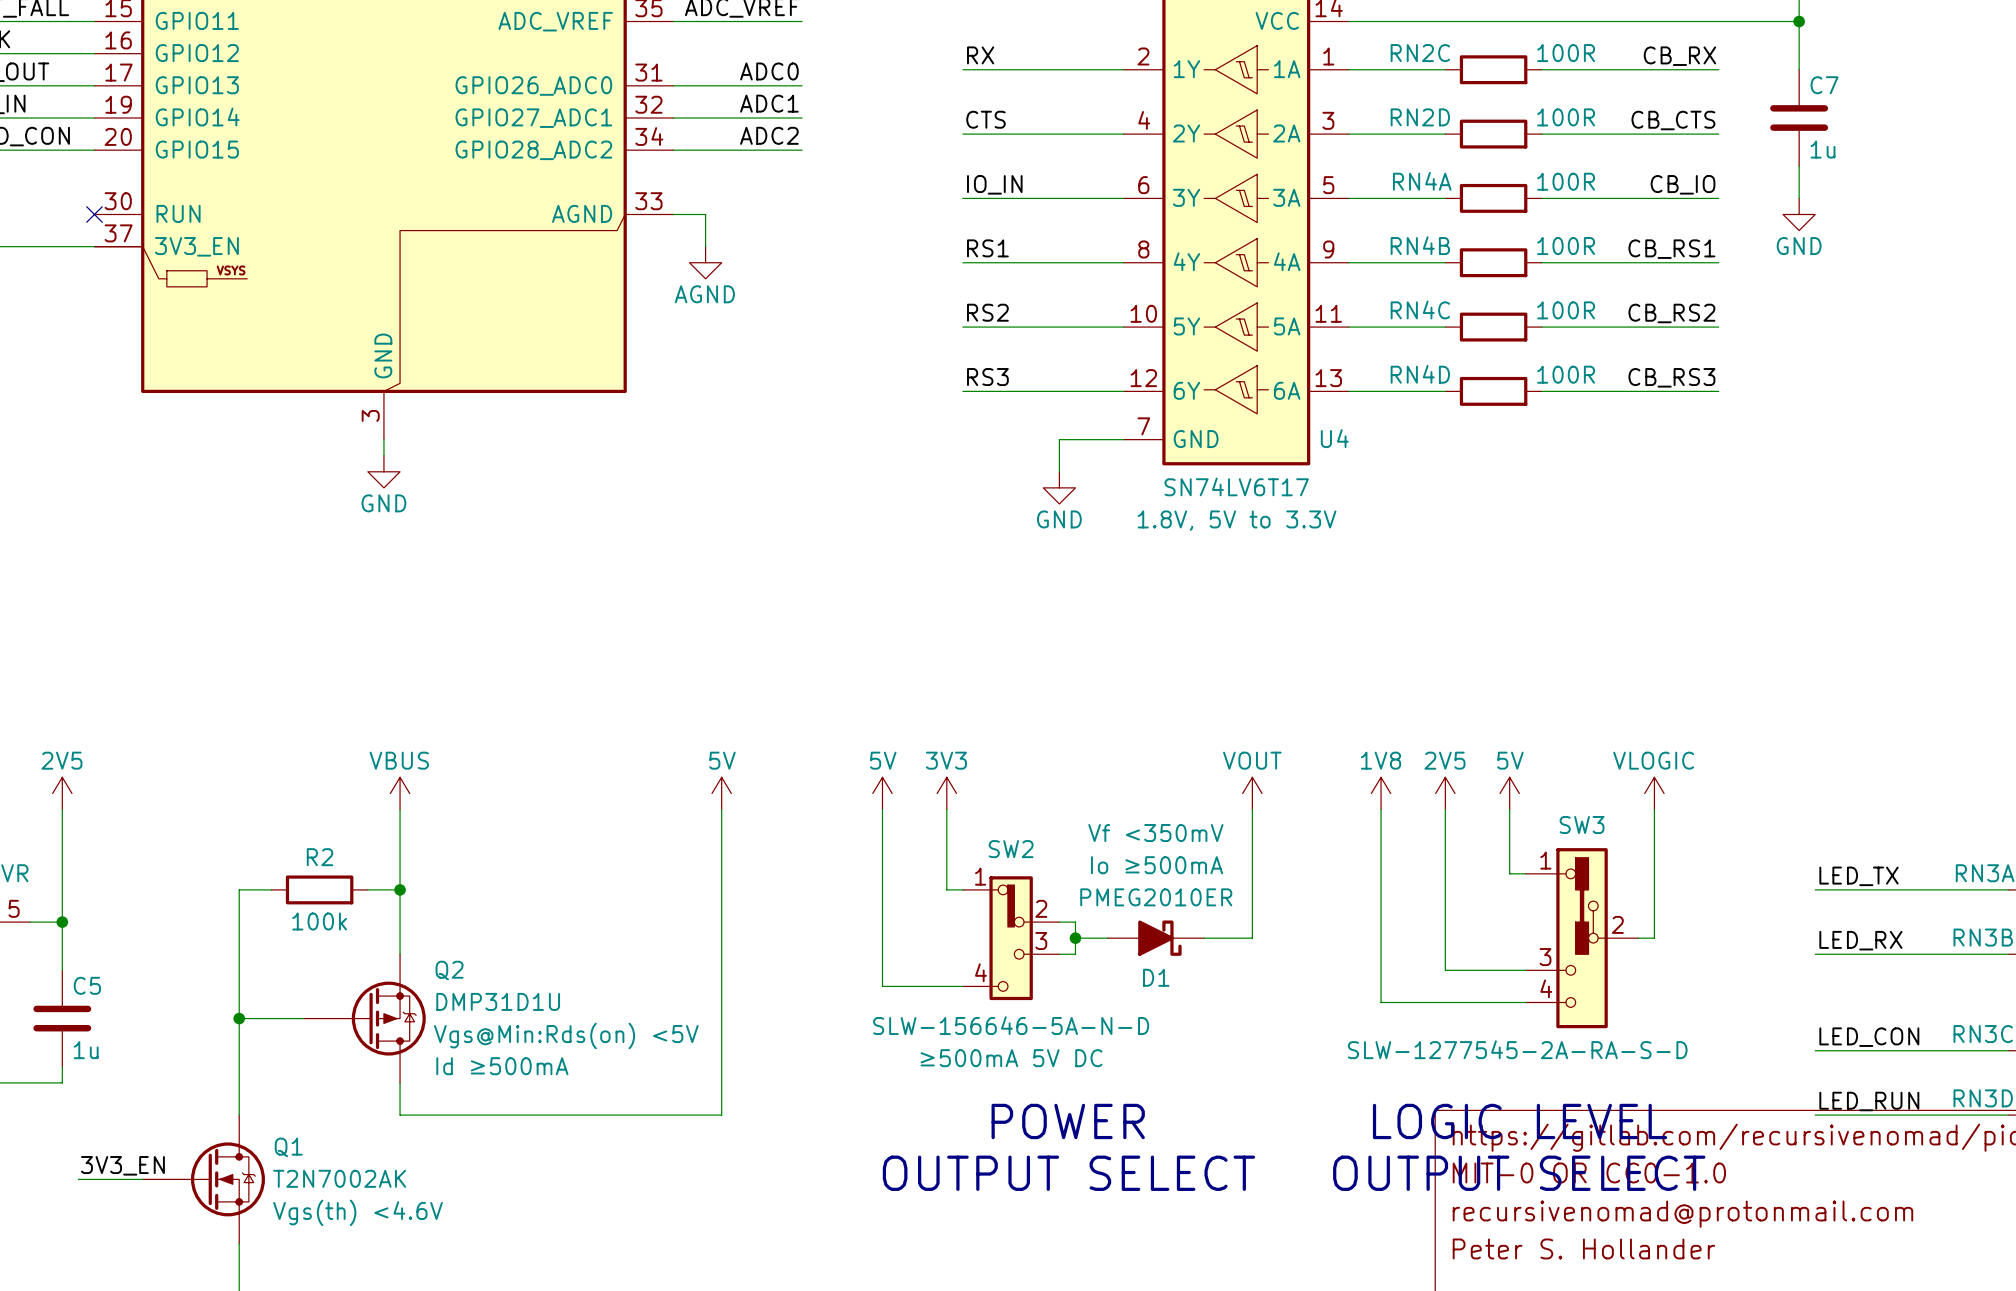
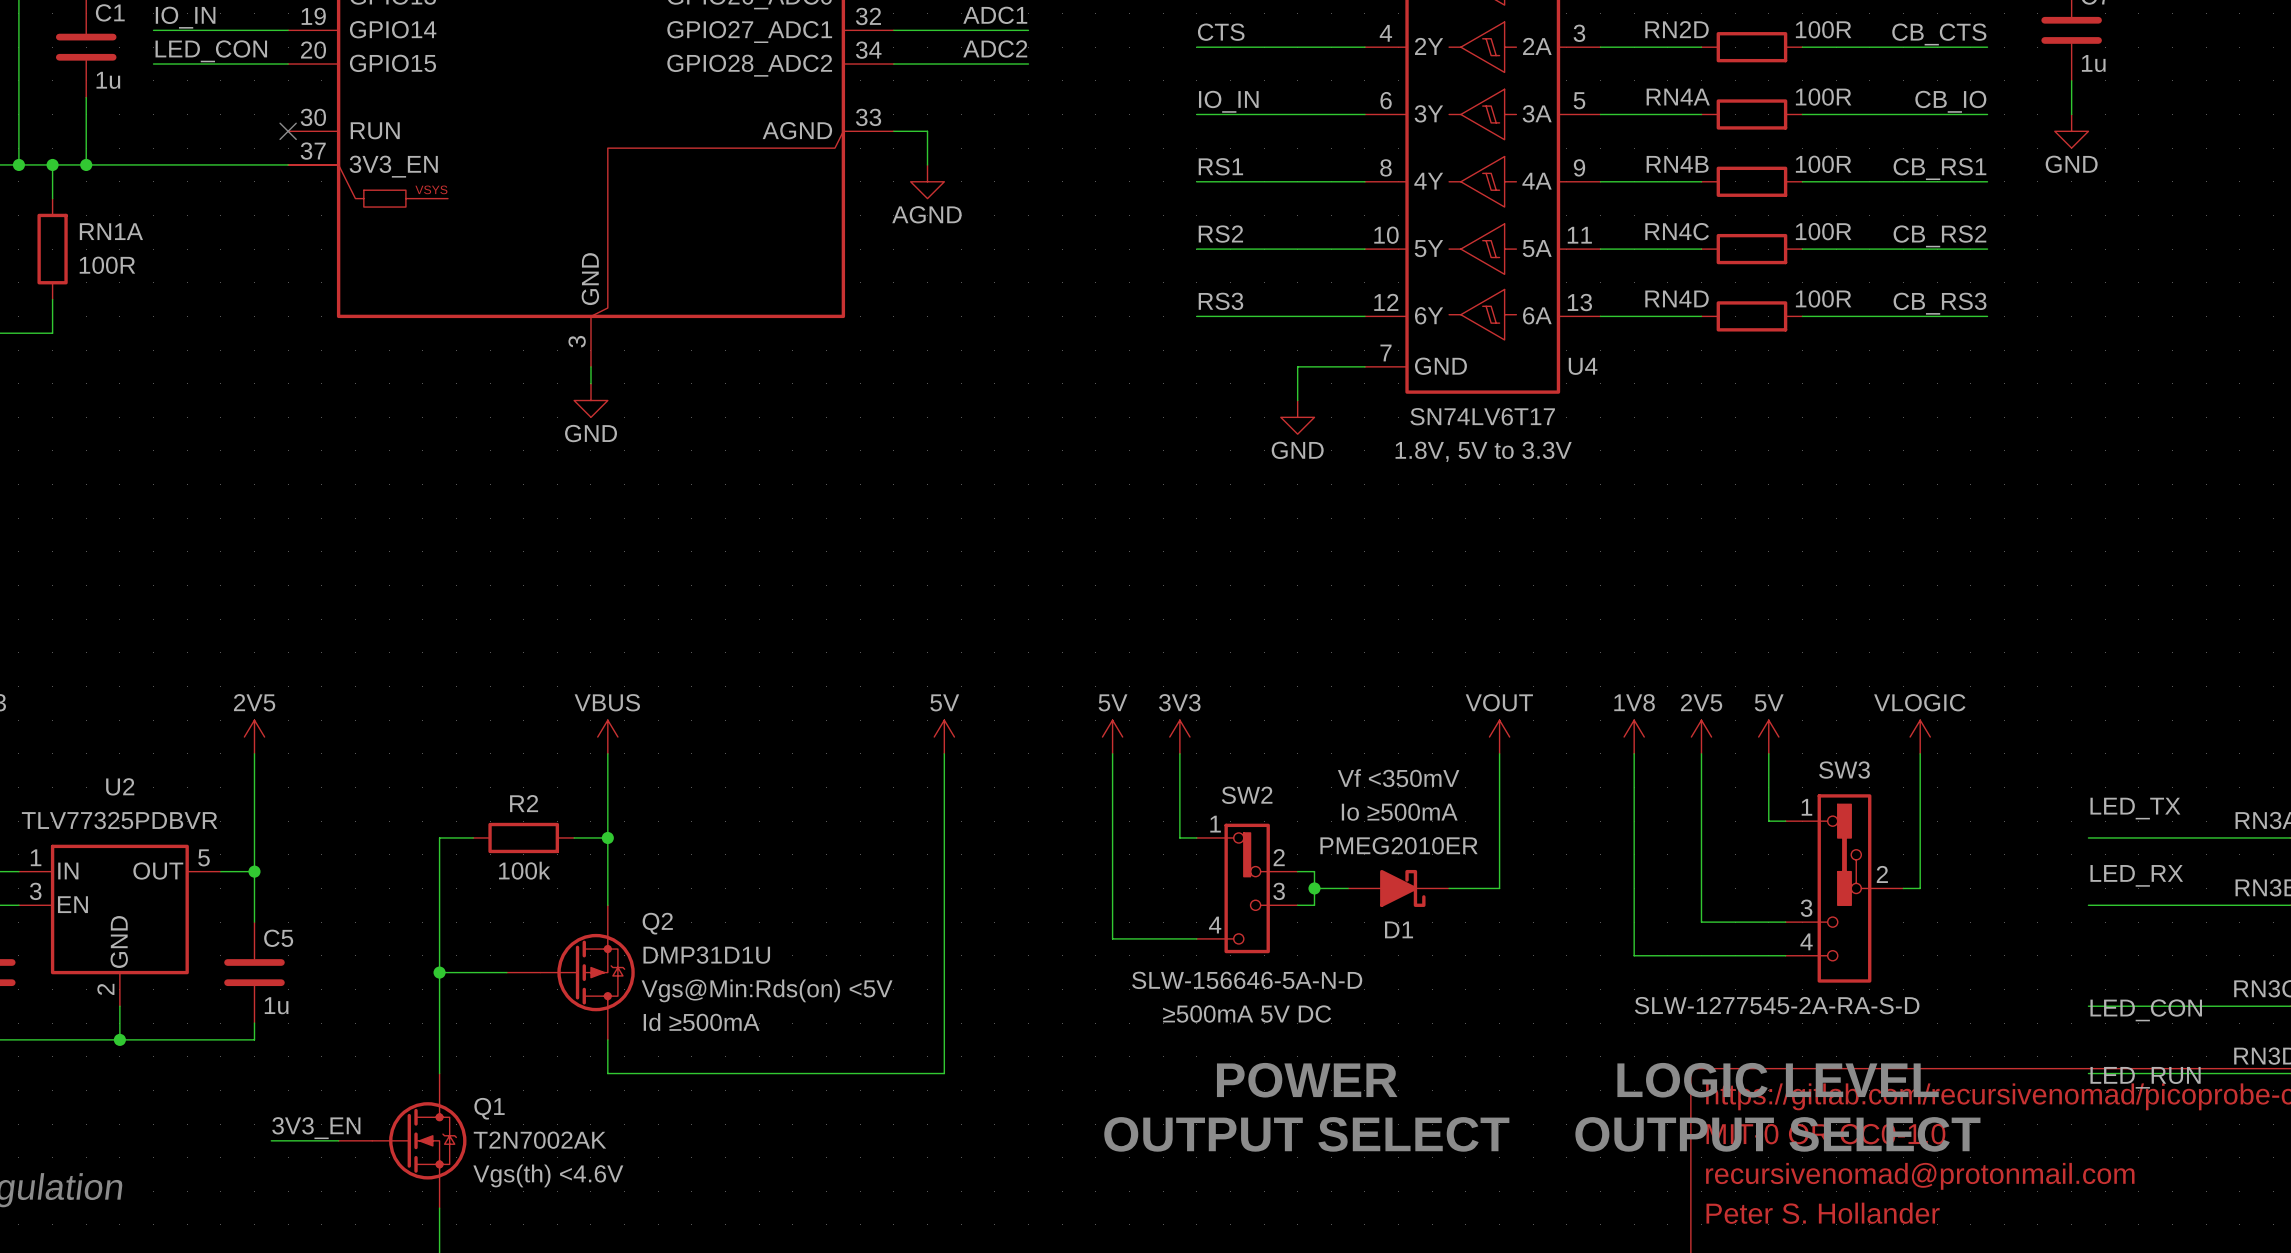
label position: LED_TX (1859, 876) -> LED_TX (2135, 808)
label position: LED_RX (1860, 940) -> LED_RX (2136, 875)
label position: LED_CON (1869, 1037) -> LED_CON (2146, 1010)
label position: LED_RUN (1869, 1101) -> LED_RUN (2145, 1077)

